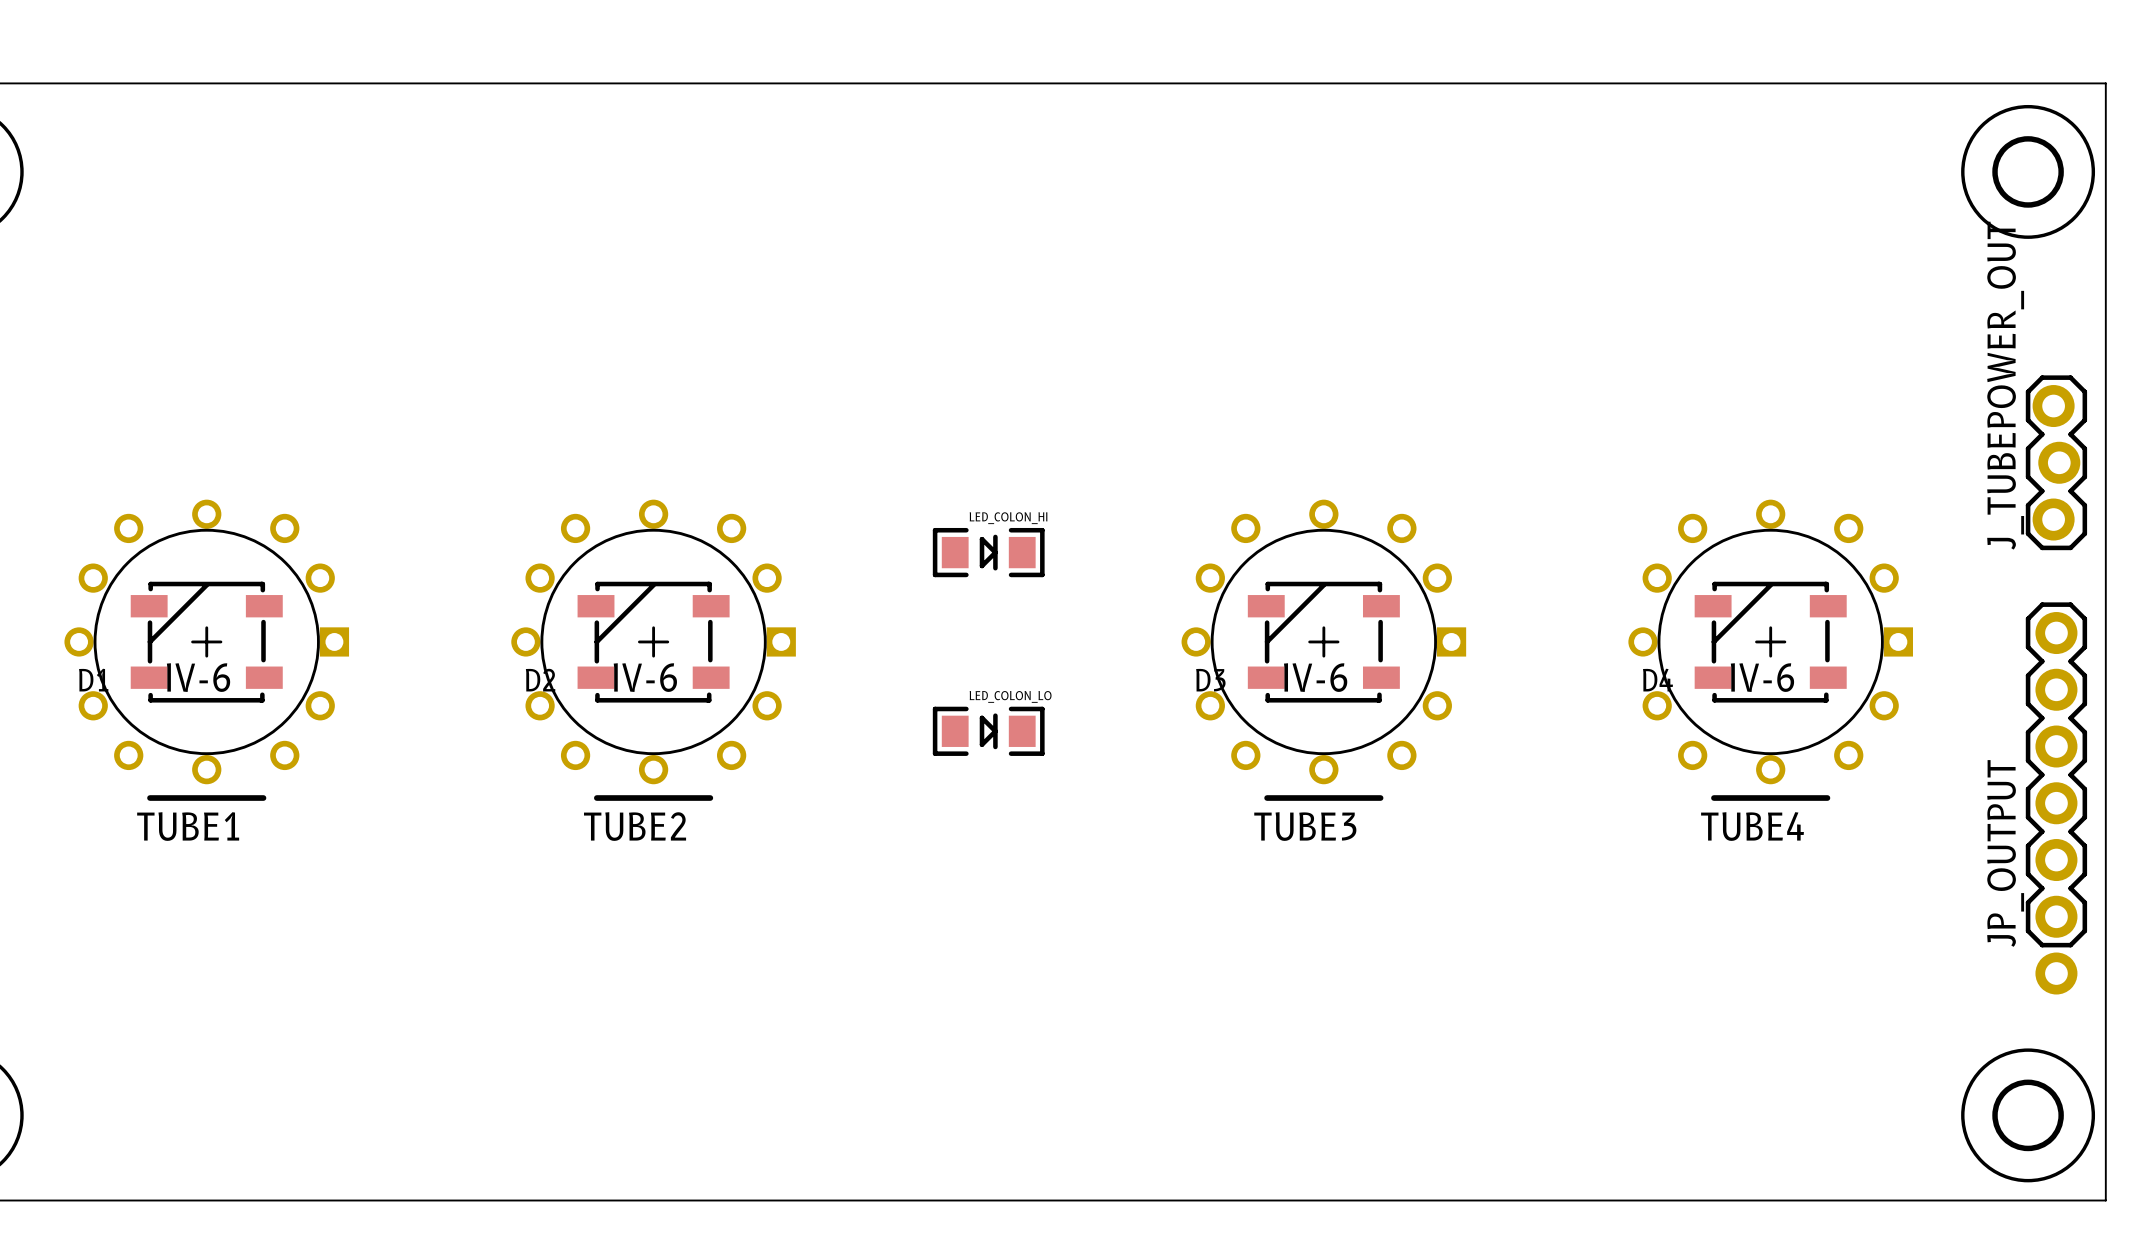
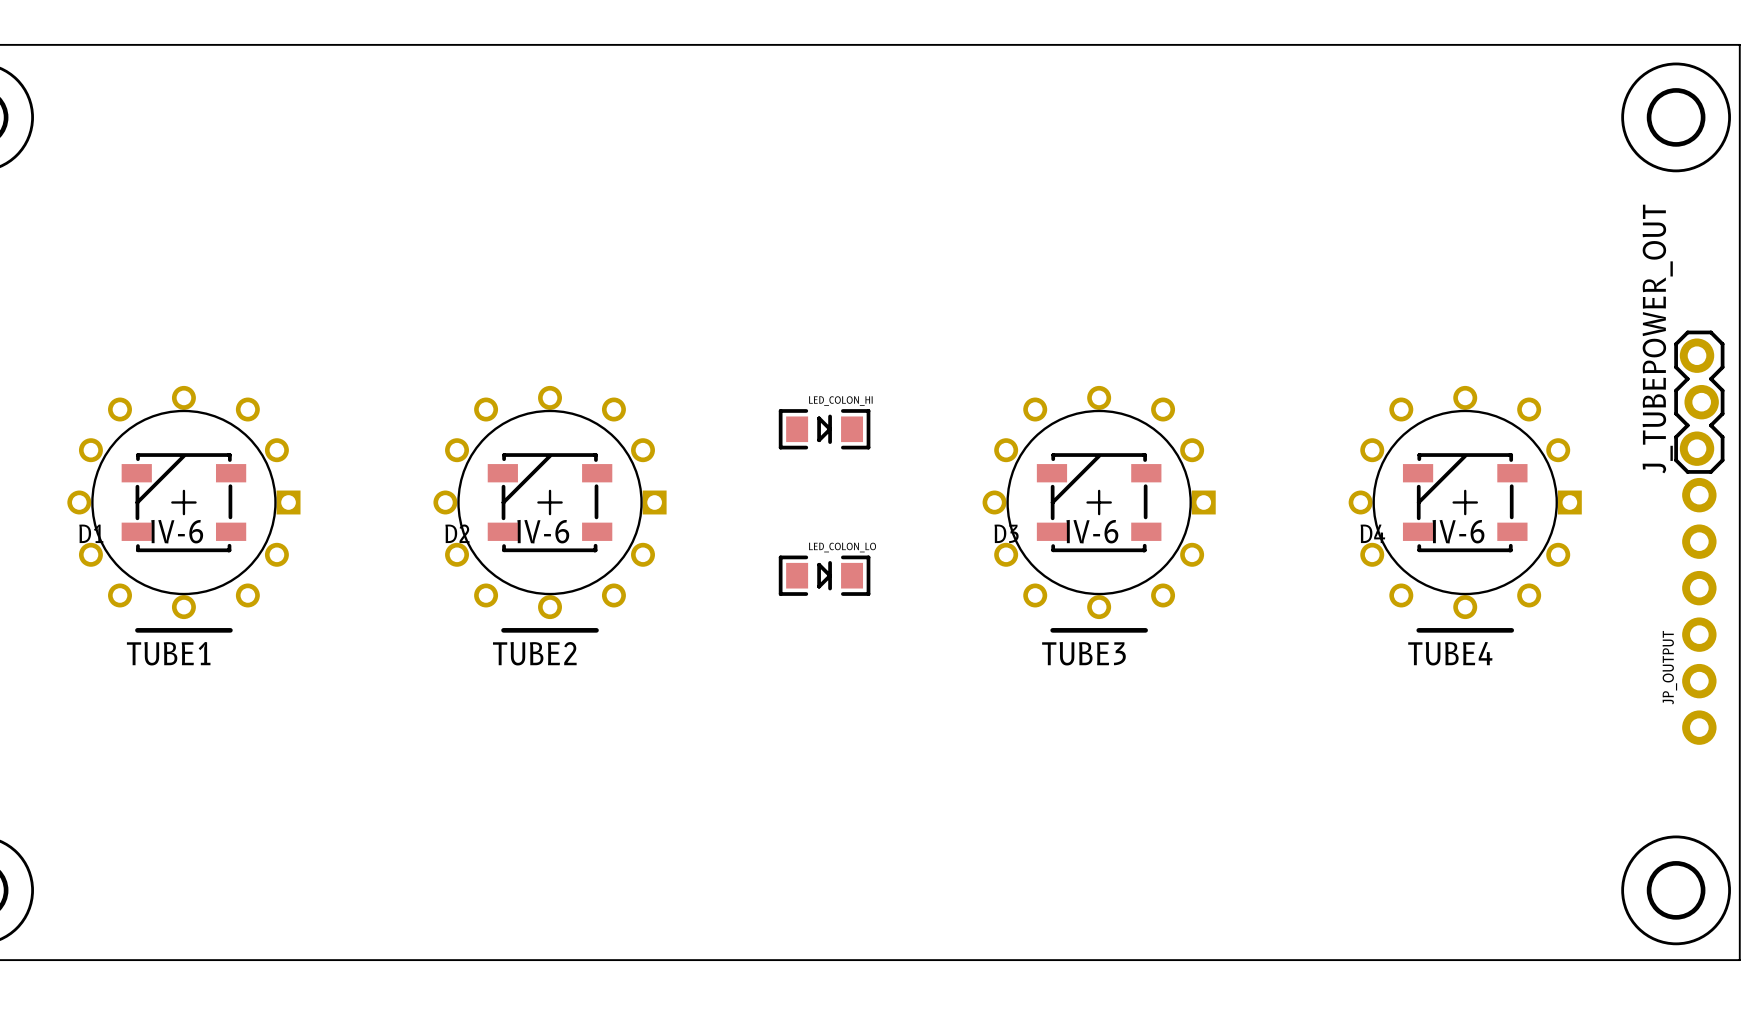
J_TUBEPOWER_OUT position: (2056, 462) -> (1699, 402)
JP_OUTPUT: none -> (1699, 588)
JP_OUTPUT: (2056, 774) -> none
part position: (2056, 973) -> (1699, 727)

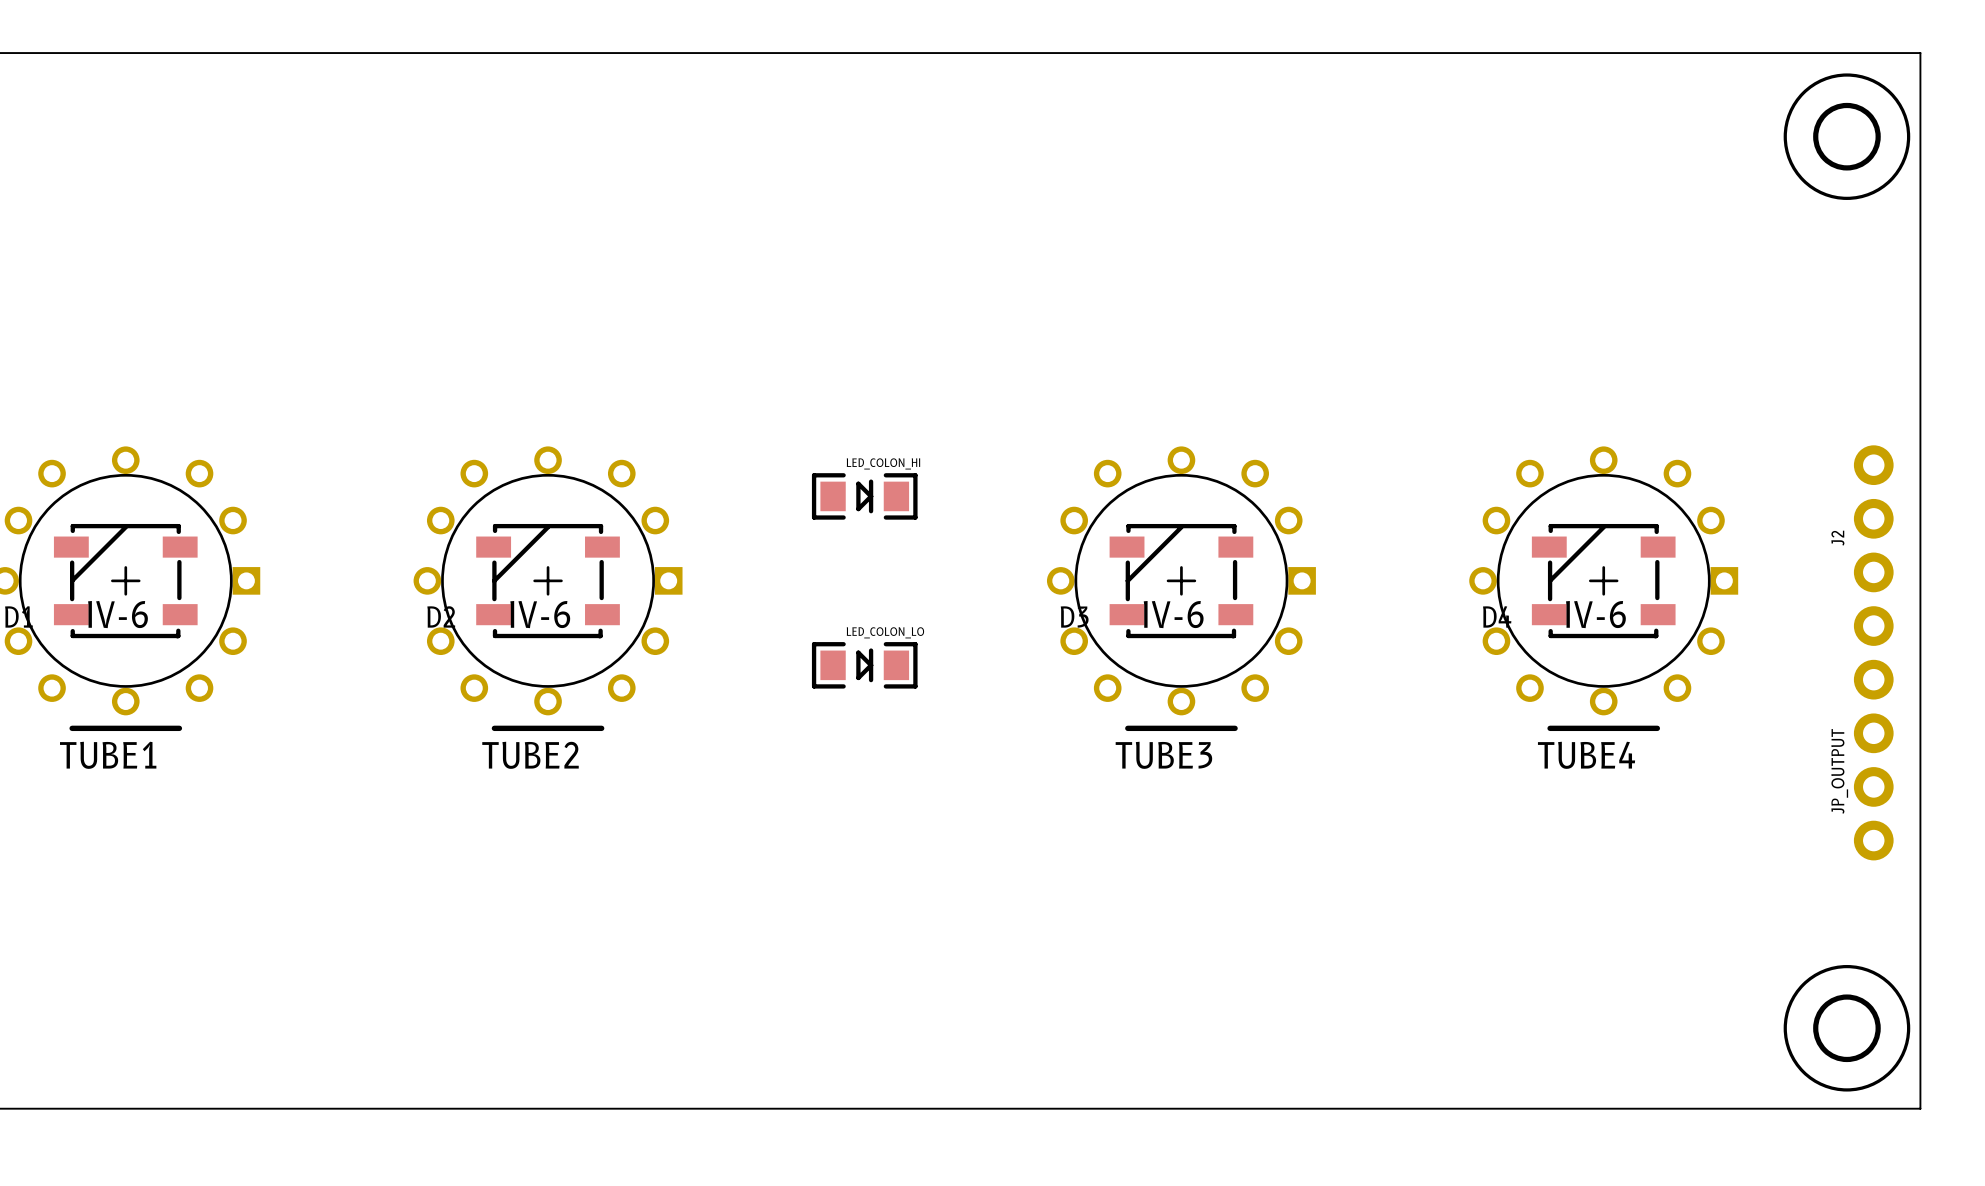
J_TUBEPOWER_OUT: (1699, 402) -> none
J2: none -> (1873, 491)

